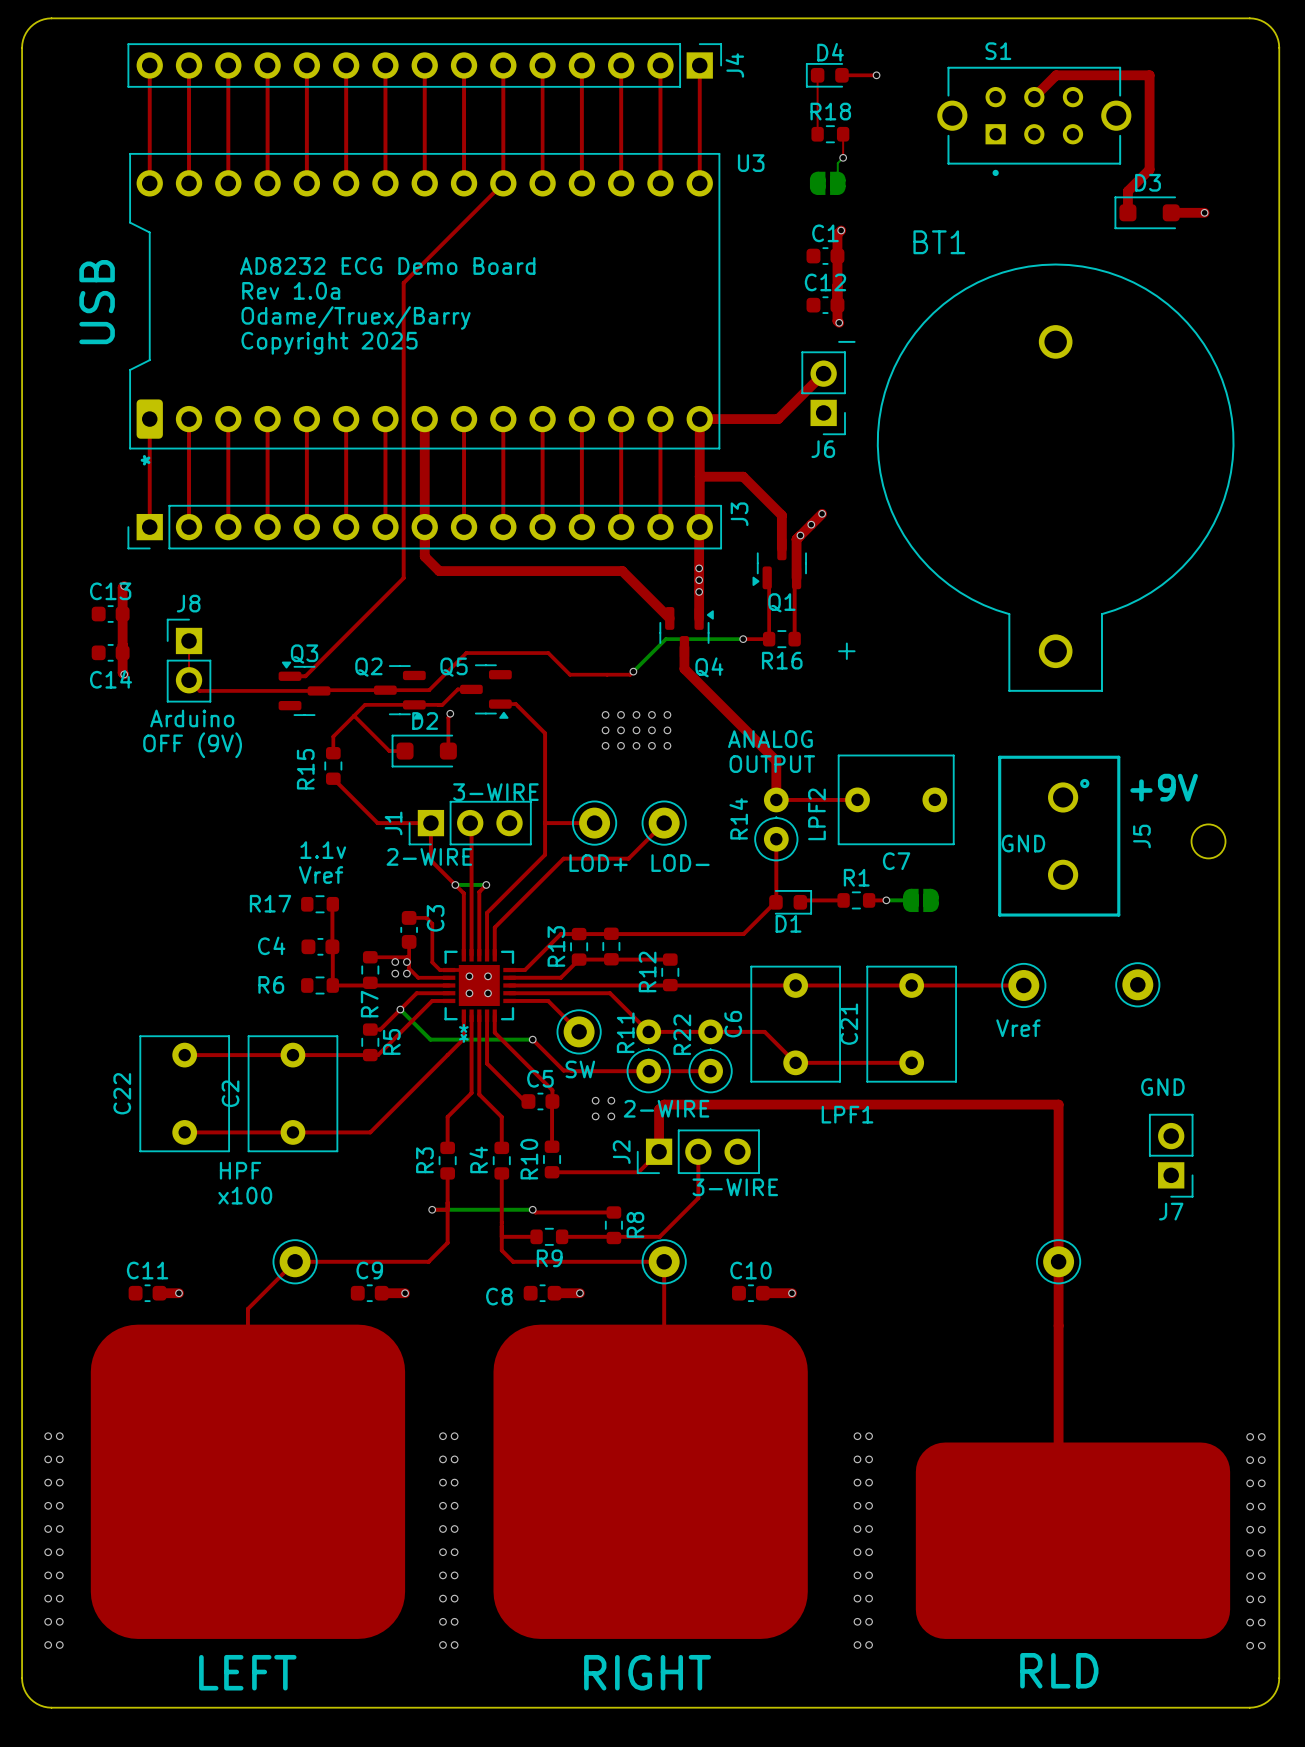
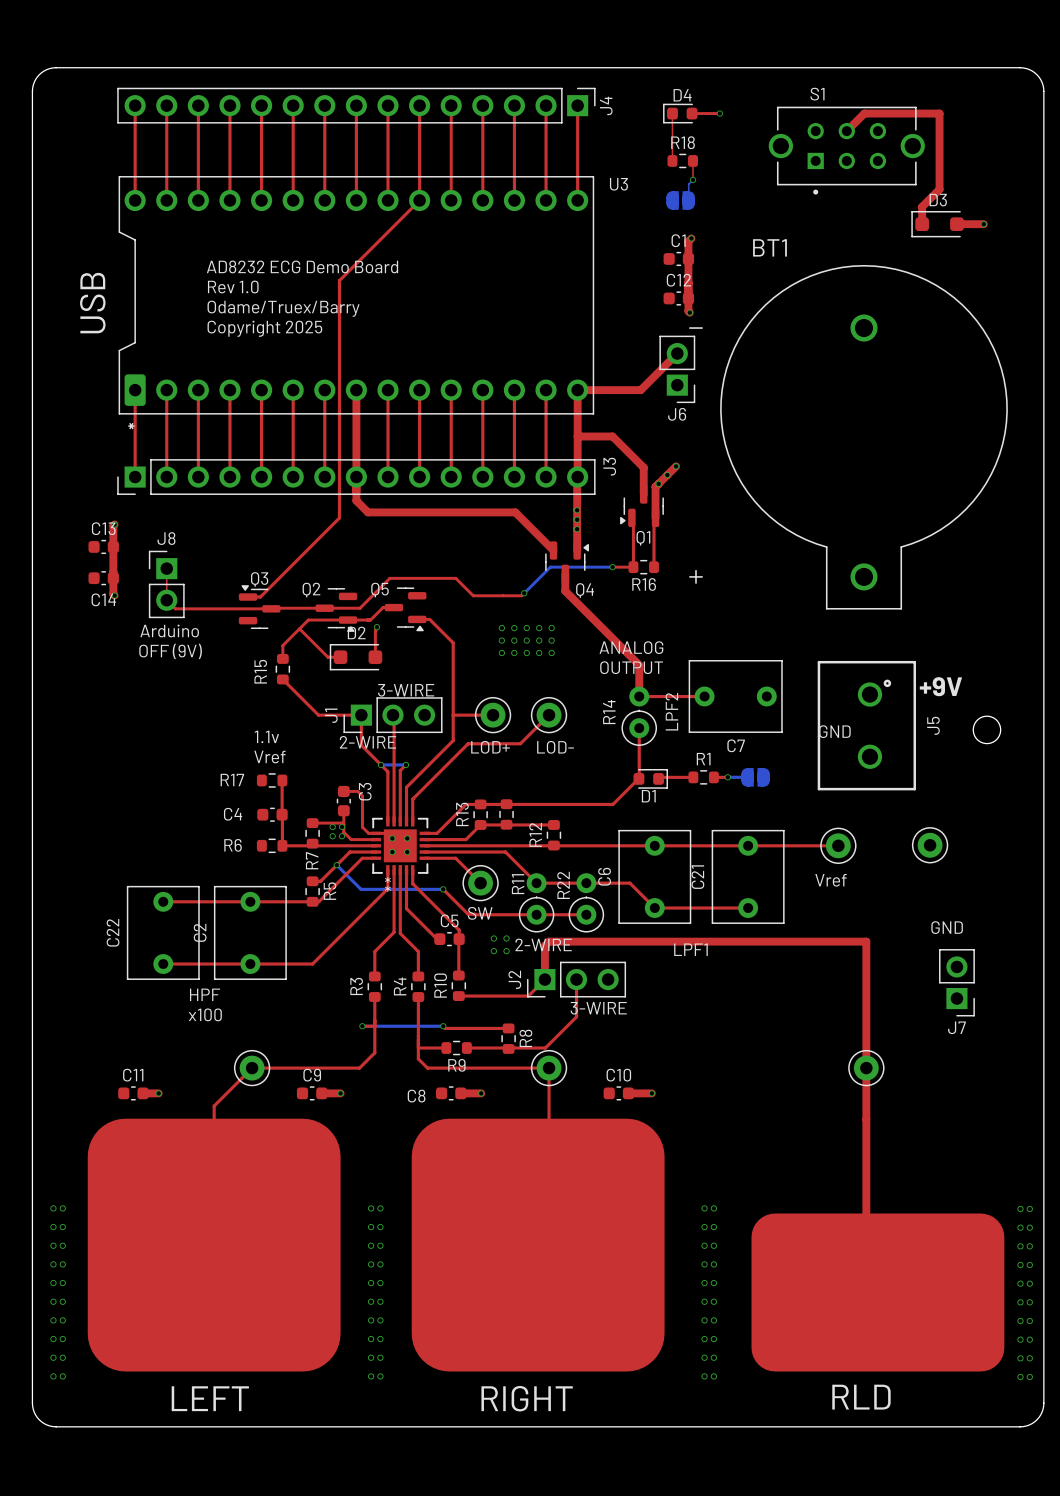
text: Rev 1.0a (291, 290) -> Rev 1.0 (233, 287)

